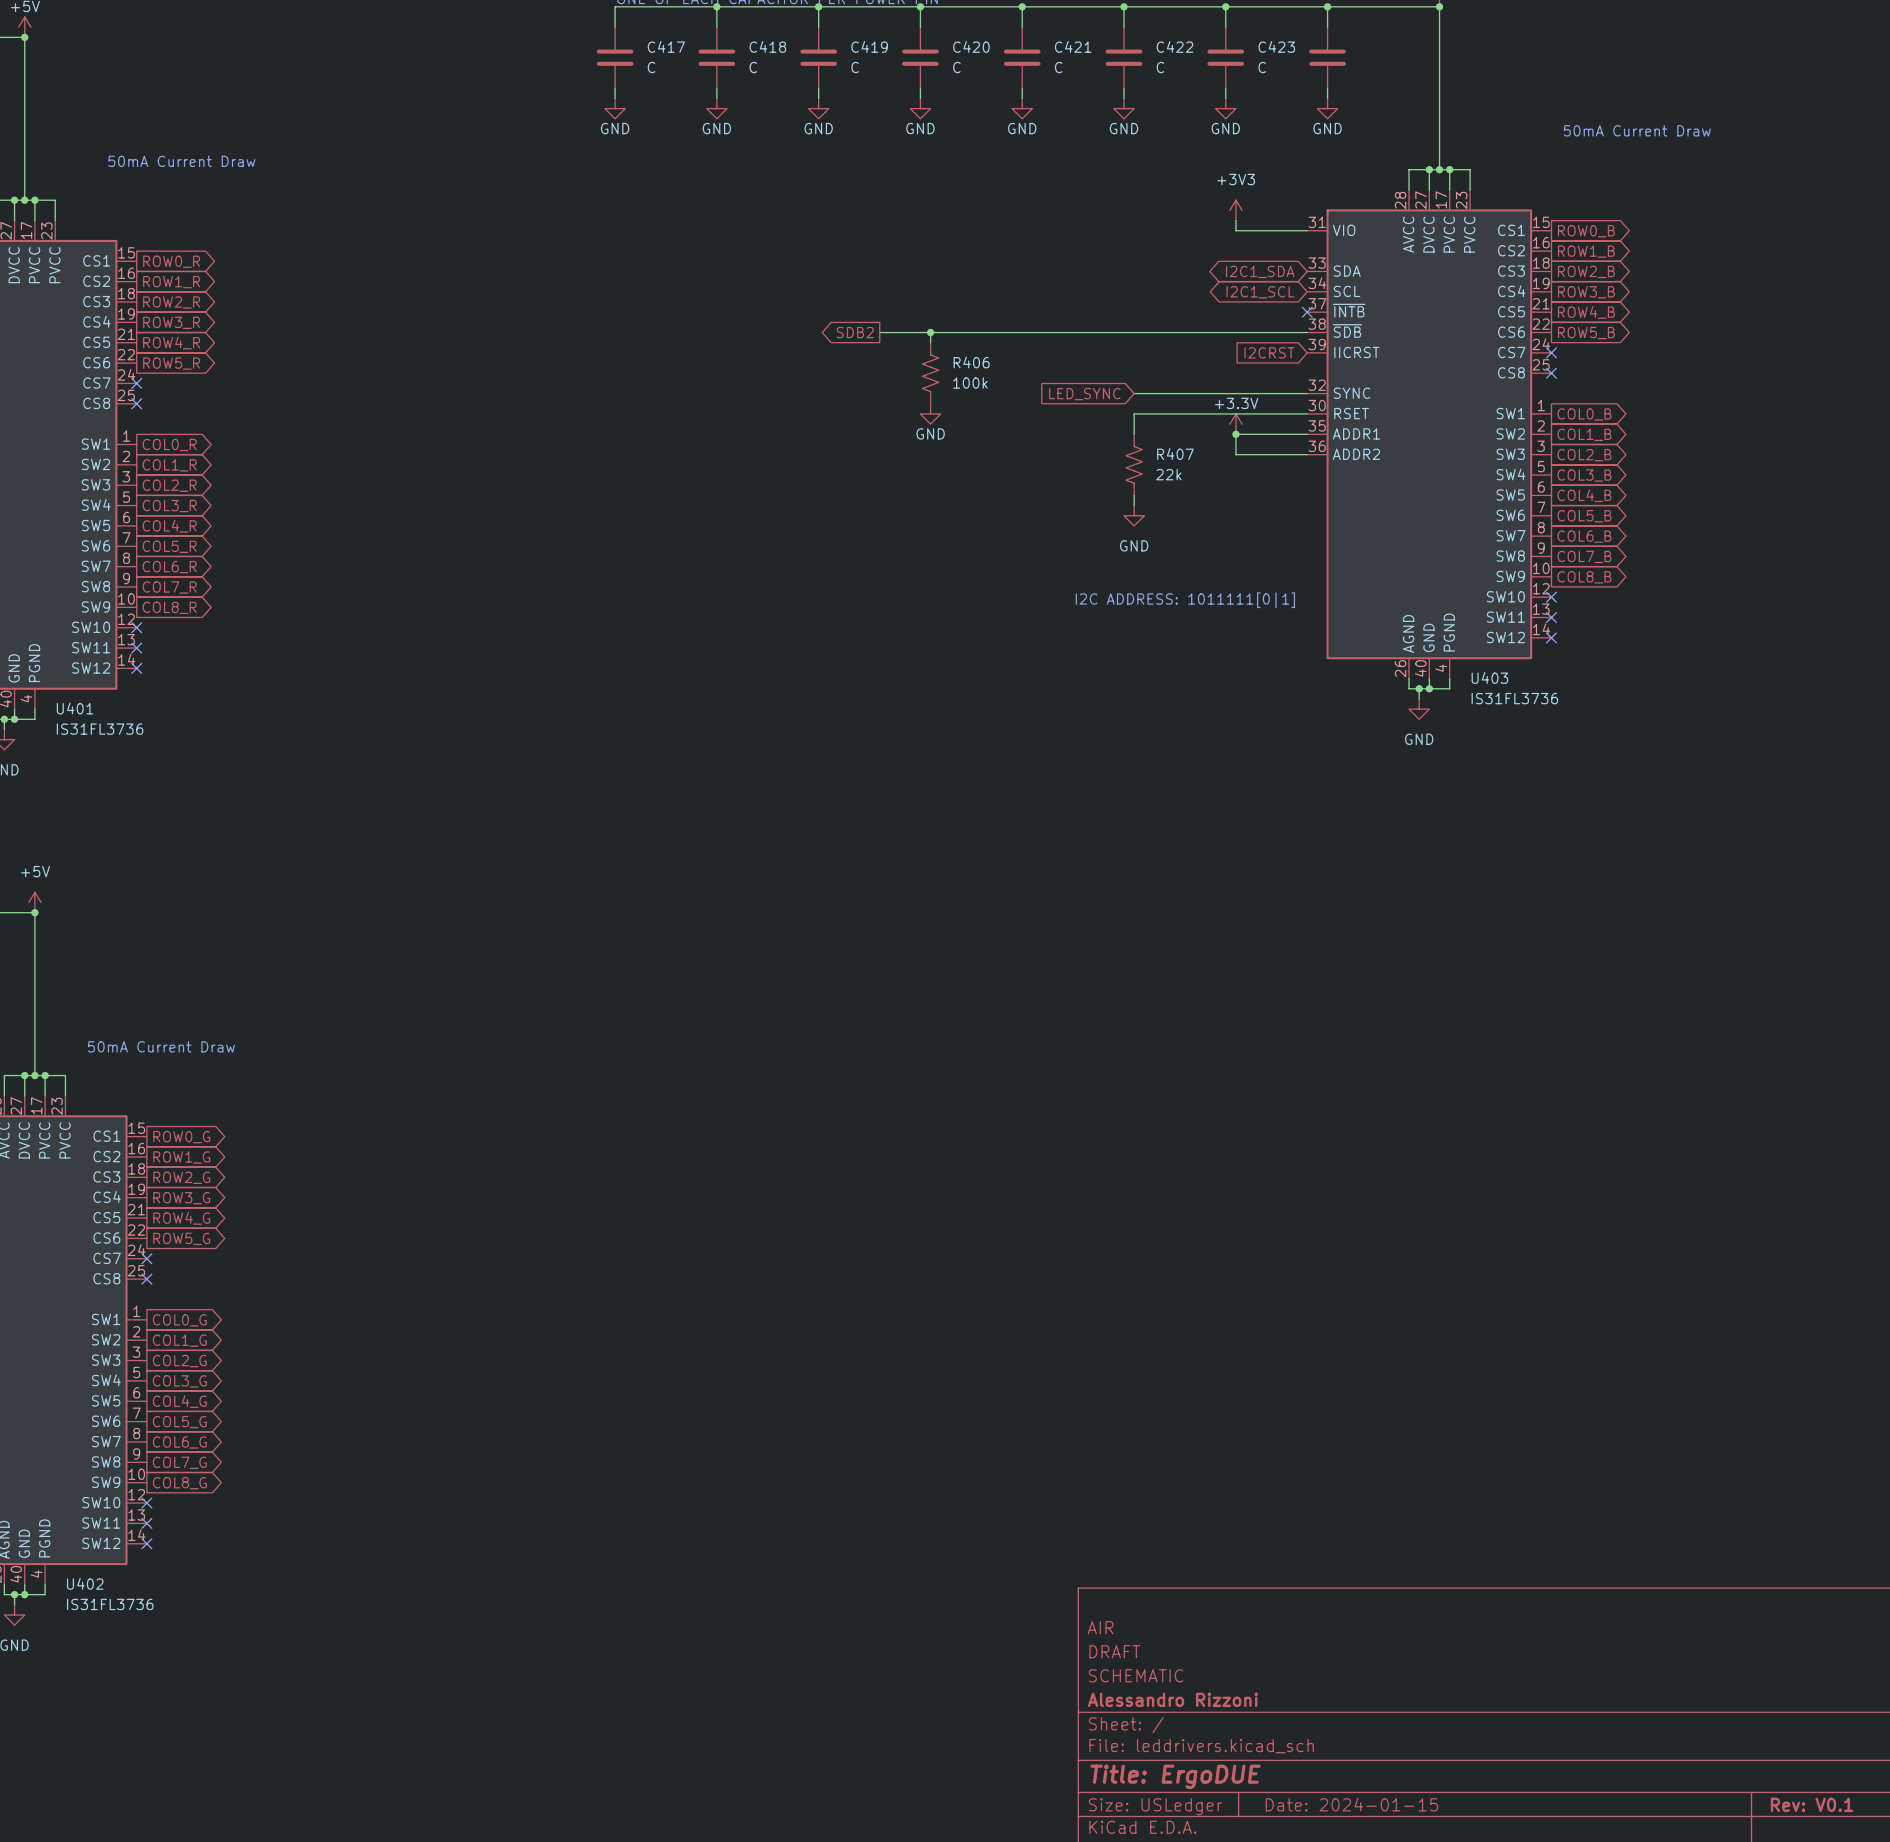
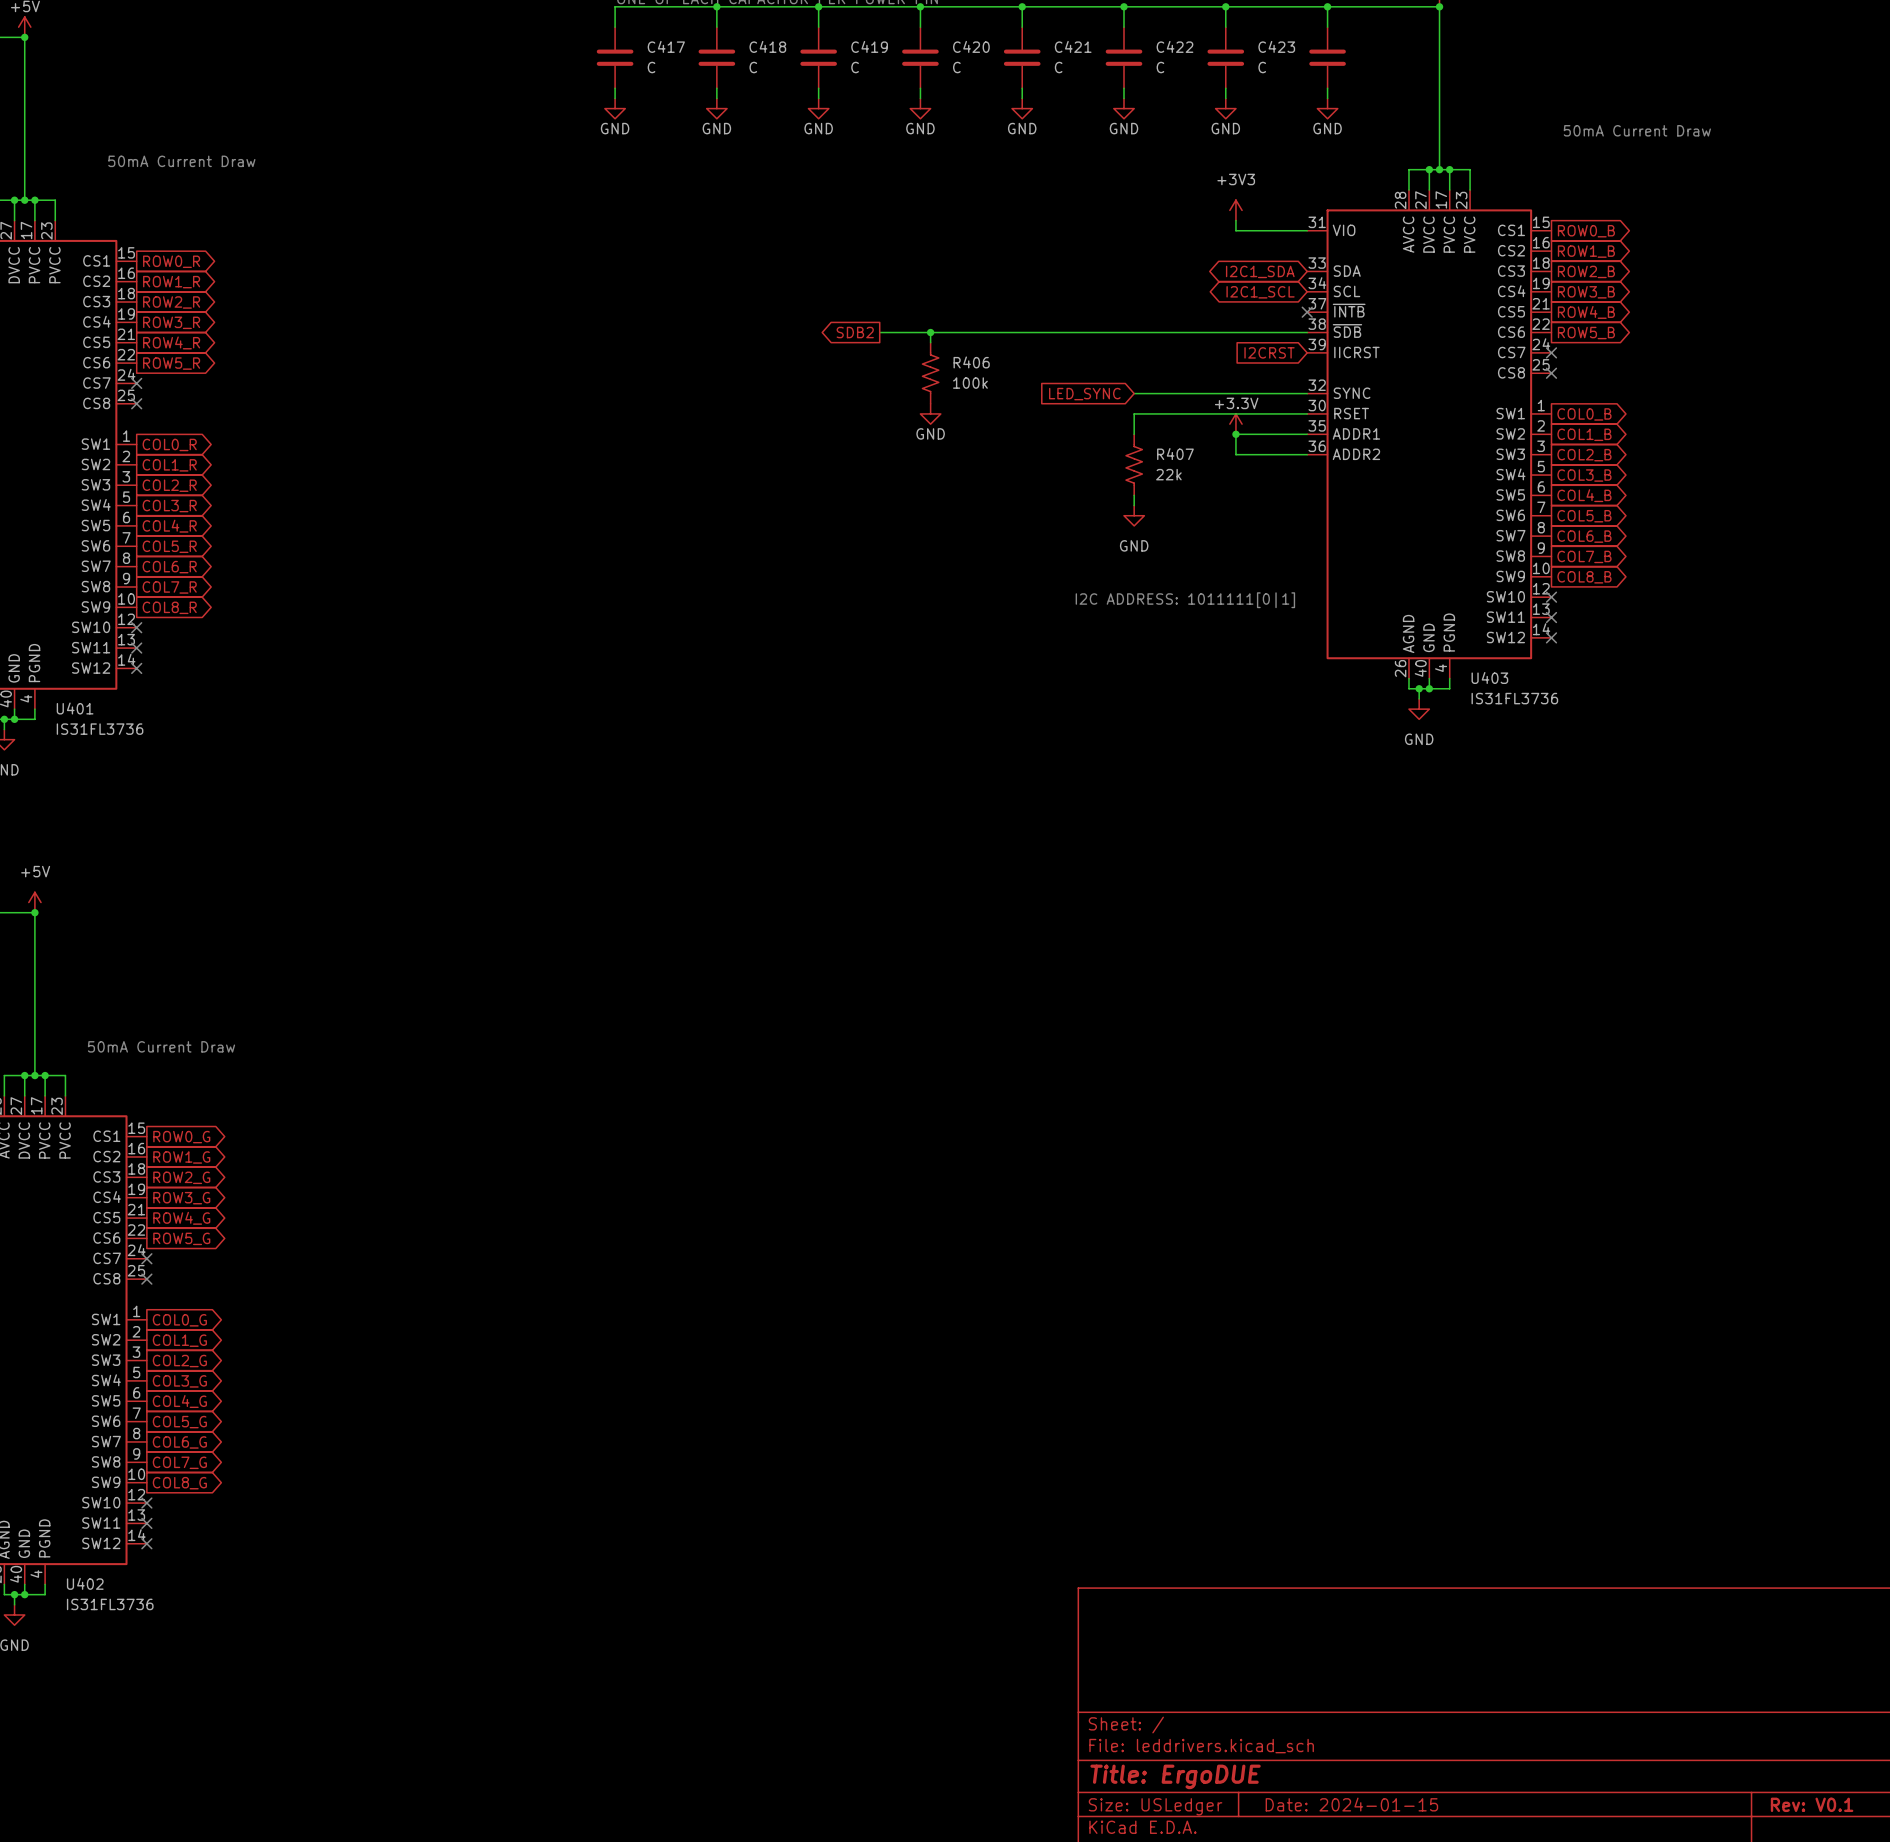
title block: AIR (1100, 1627) -> none
title block: DRAFT (1114, 1651) -> none
title block: SCHEMATIC (1136, 1675) -> none
title block: Alessandro Rizzoni (1172, 1699) -> none

